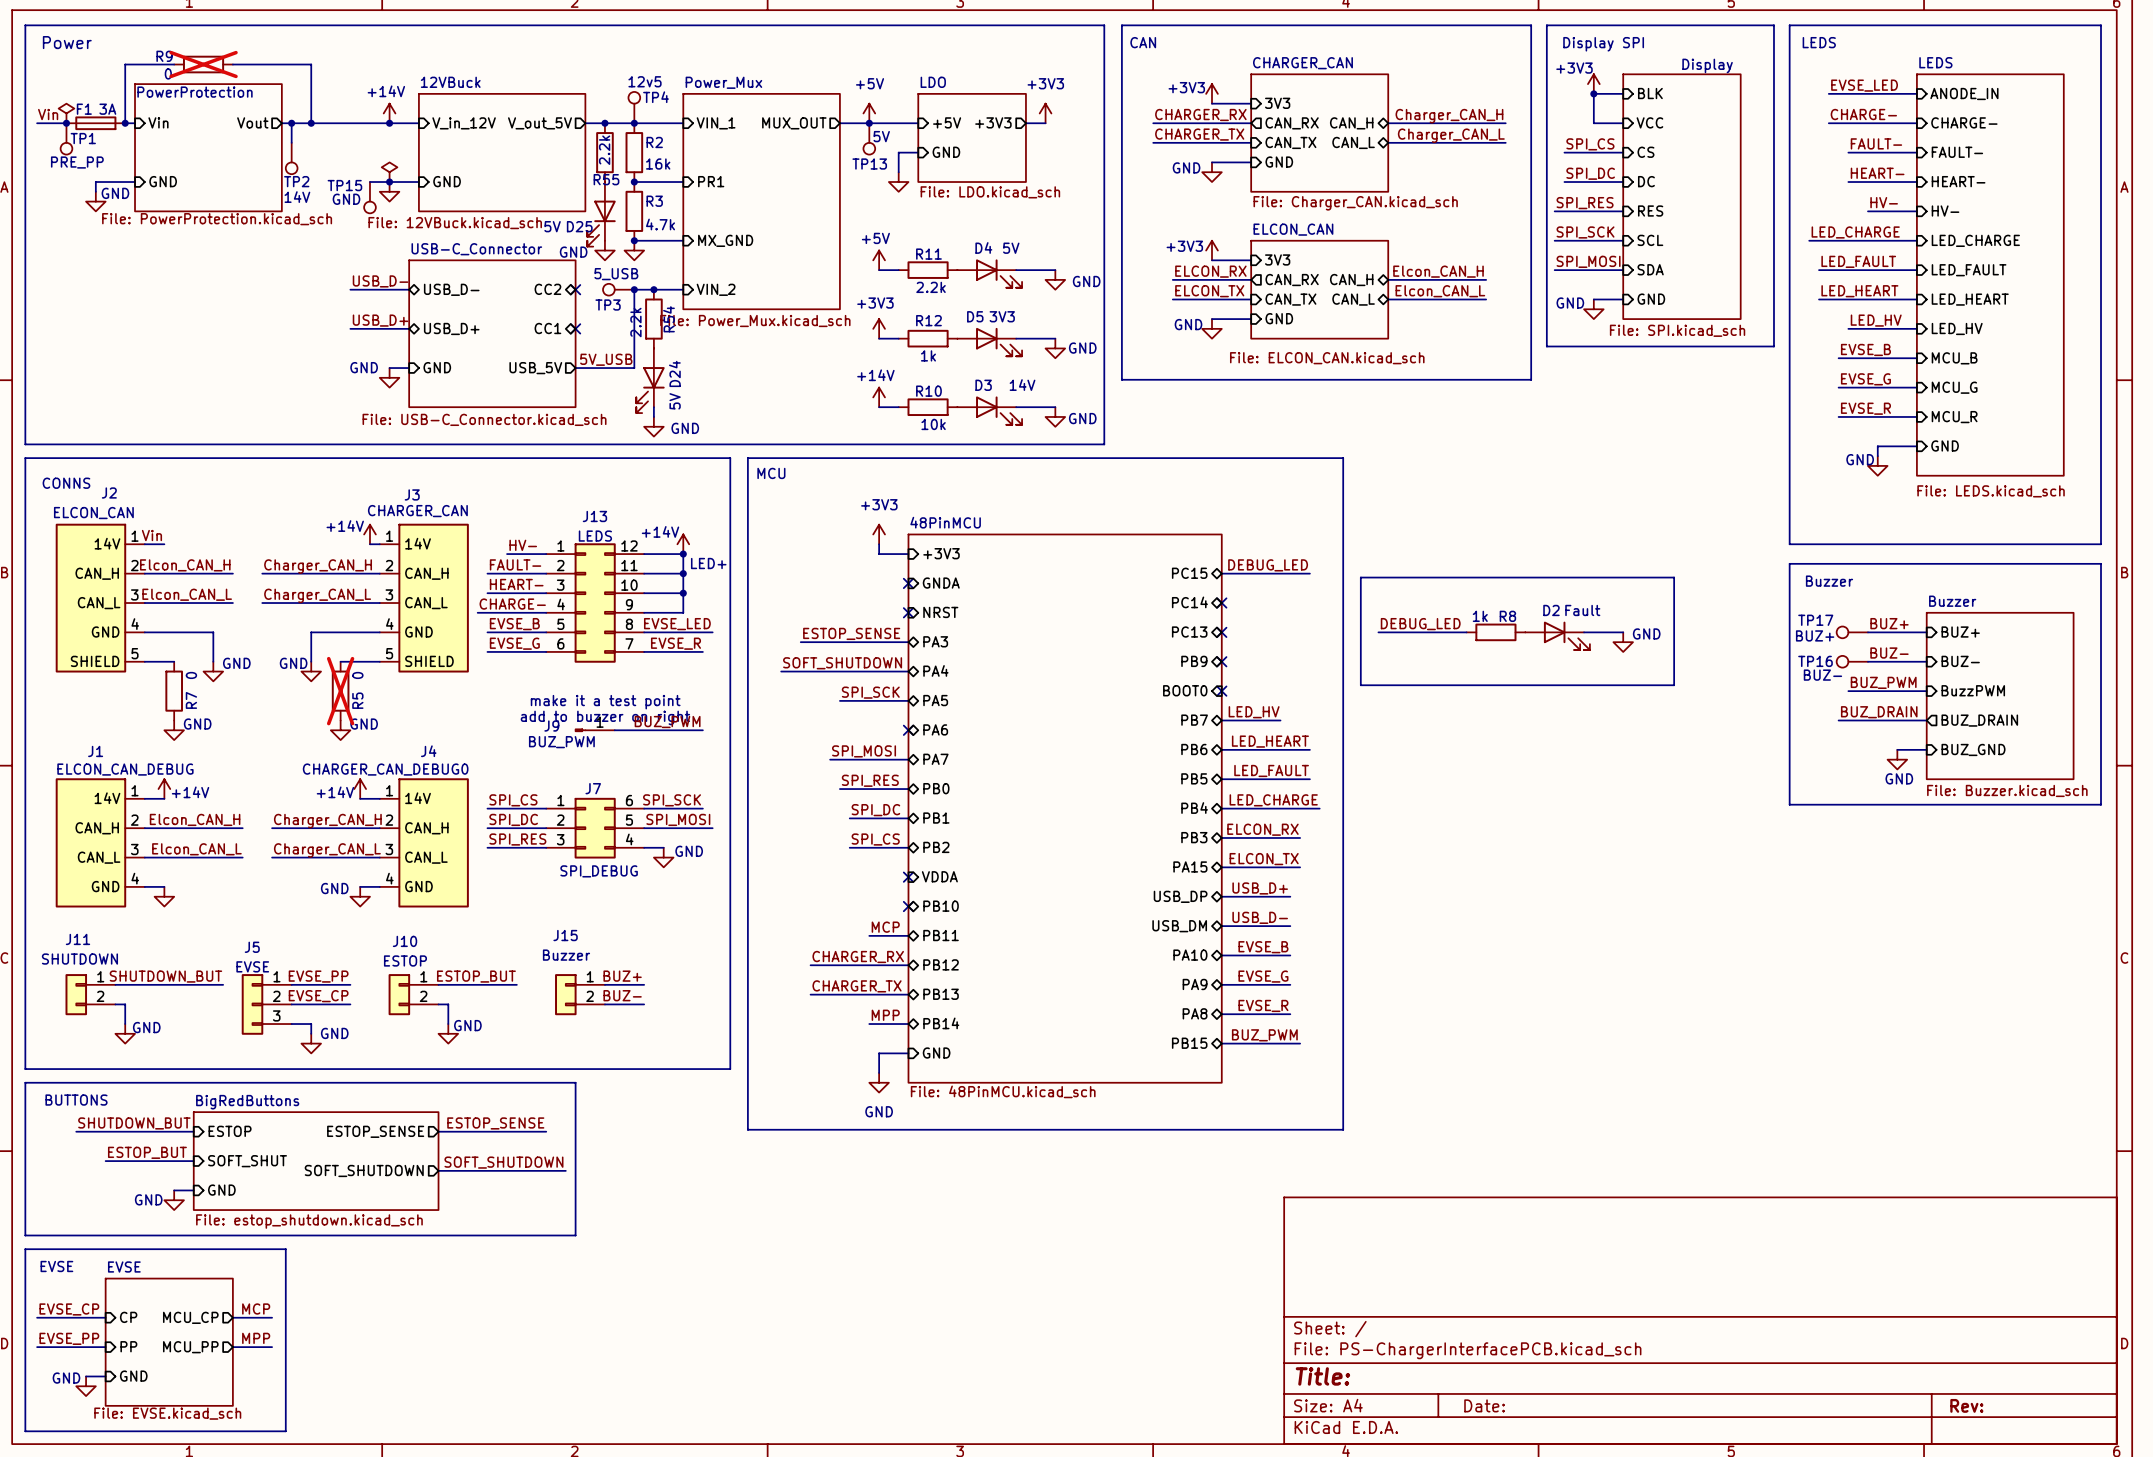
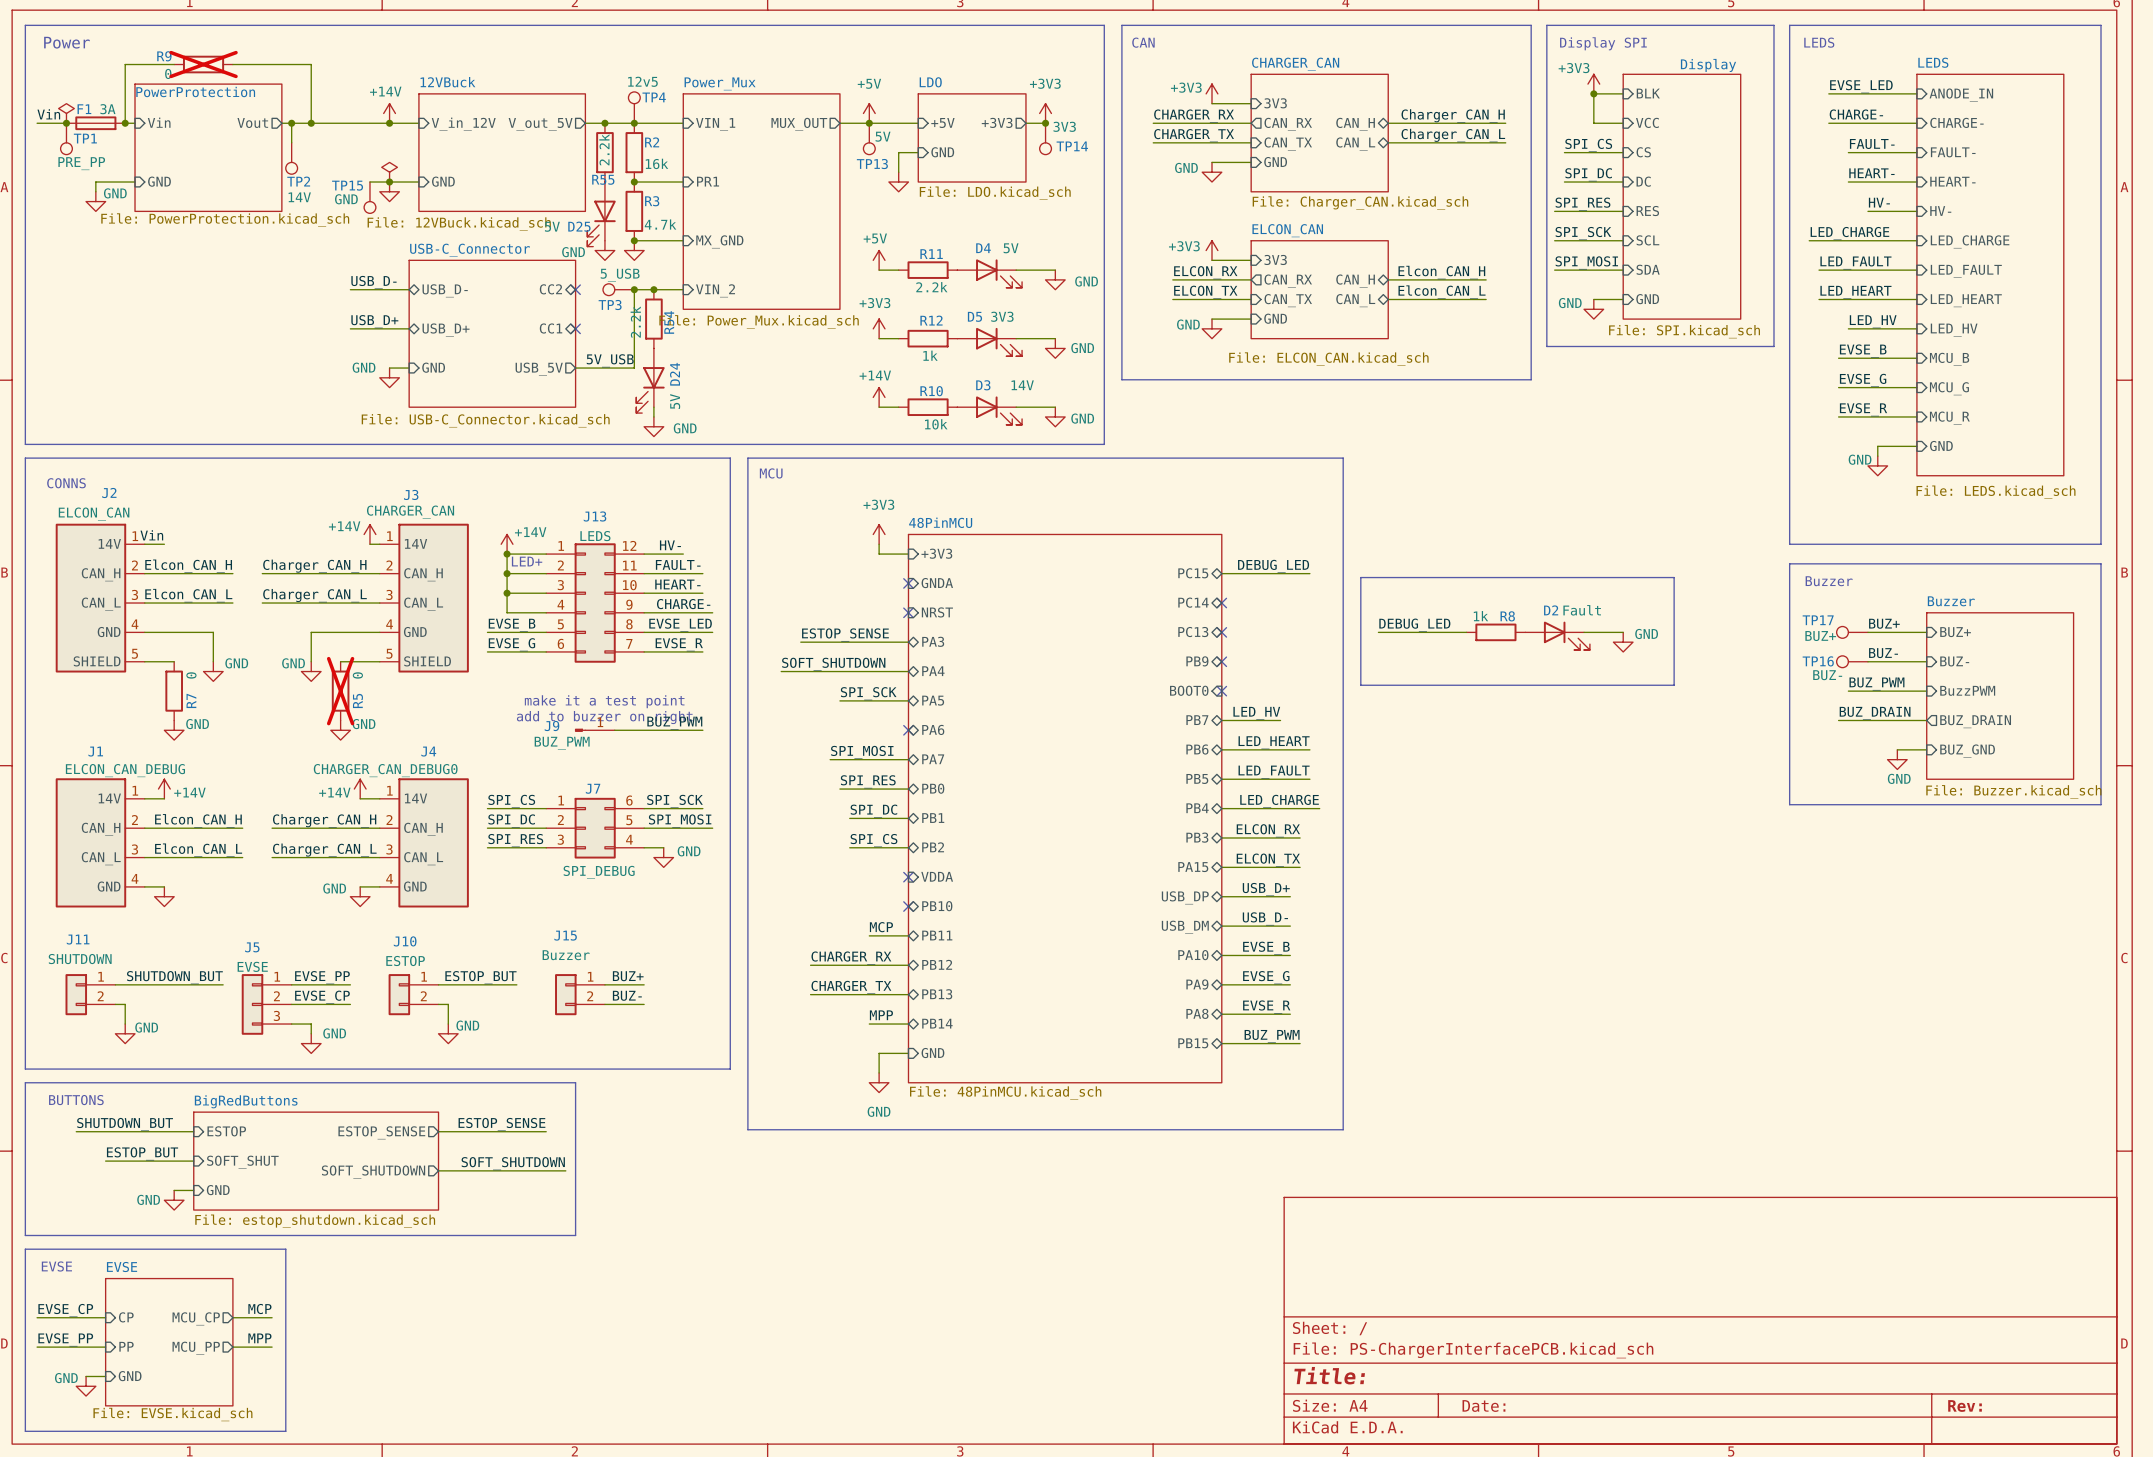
junction: none -> (1045, 123)
TP14: none -> 3V3 (1045, 138)
power symbol text position: +14V (660, 531) -> +14V (530, 532)
power symbol position: +14V (683, 544) -> +14V (507, 544)
label position: HV- (523, 545) -> HV- (670, 545)
junction: none -> (507, 554)
wire: (683, 554) (683, 612) -> (712, 612) (683, 612)
junction: (683, 554) -> none
text position: LED+ (708, 563) -> LED+ (527, 561)
label: FAULT- (515, 564) -> none
label: none -> FAULT- (678, 564)
wire: (487, 573) (507, 573) -> none
junction: none -> (507, 573)
wire: none -> (683, 573) (702, 573)
junction: (683, 573) -> none
label: HEART- (516, 584) -> none
label: none -> HEART- (677, 584)
wire: (487, 593) (507, 593) -> none
junction: none -> (507, 593)
wire: none -> (683, 593) (702, 593)
junction: (683, 593) -> none
label: CHARGE- (512, 604) -> none
label: none -> CHARGE- (683, 604)
wire: (477, 612) (507, 612) -> (507, 554) (507, 612)

